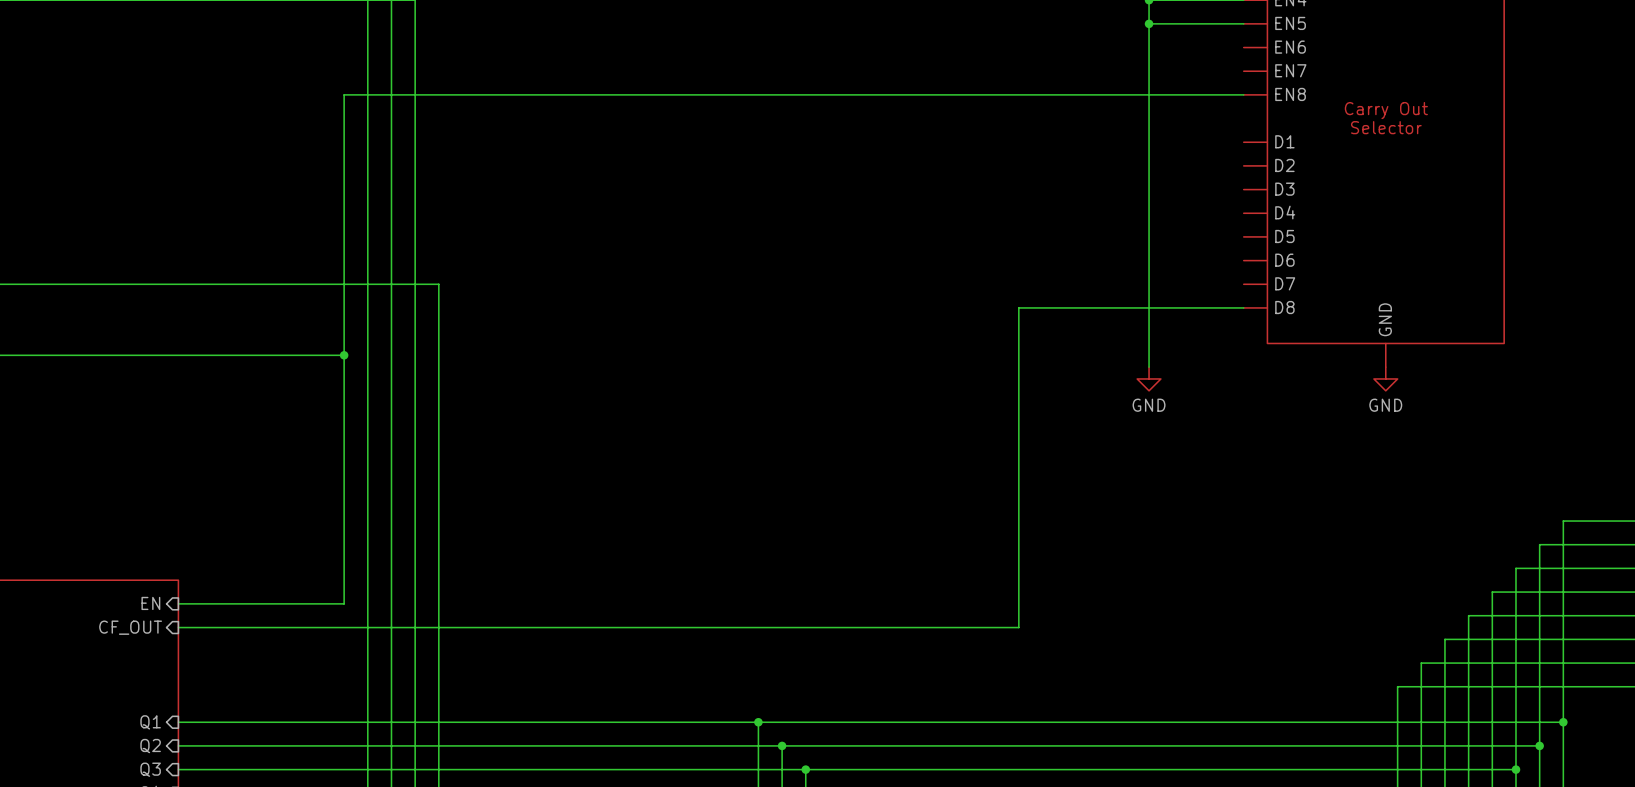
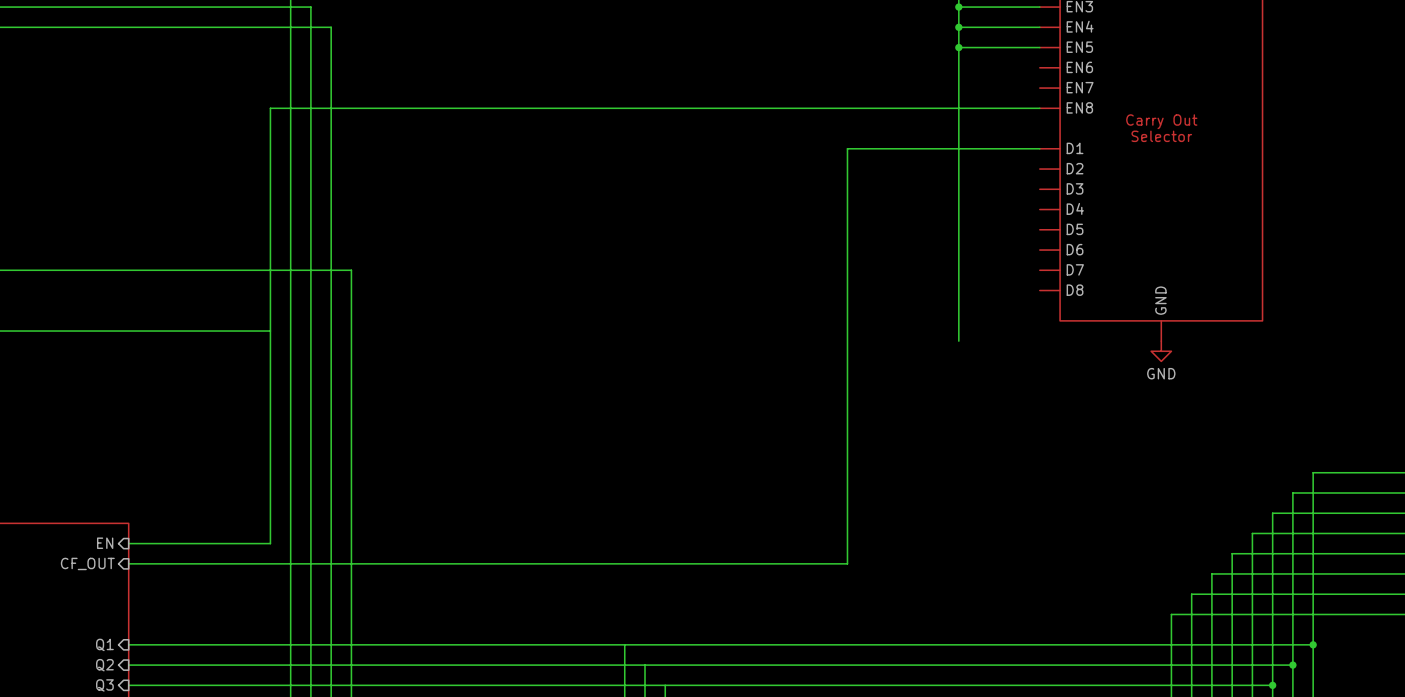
wire: (1018, 307) (1243, 307) -> (847, 290) (847, 148) (1039, 148)
junction: (344, 355) -> none
power symbol: GND (1149, 378) -> none
junction: (758, 722) -> none
junction: (782, 745) -> none
junction: (805, 769) -> none

